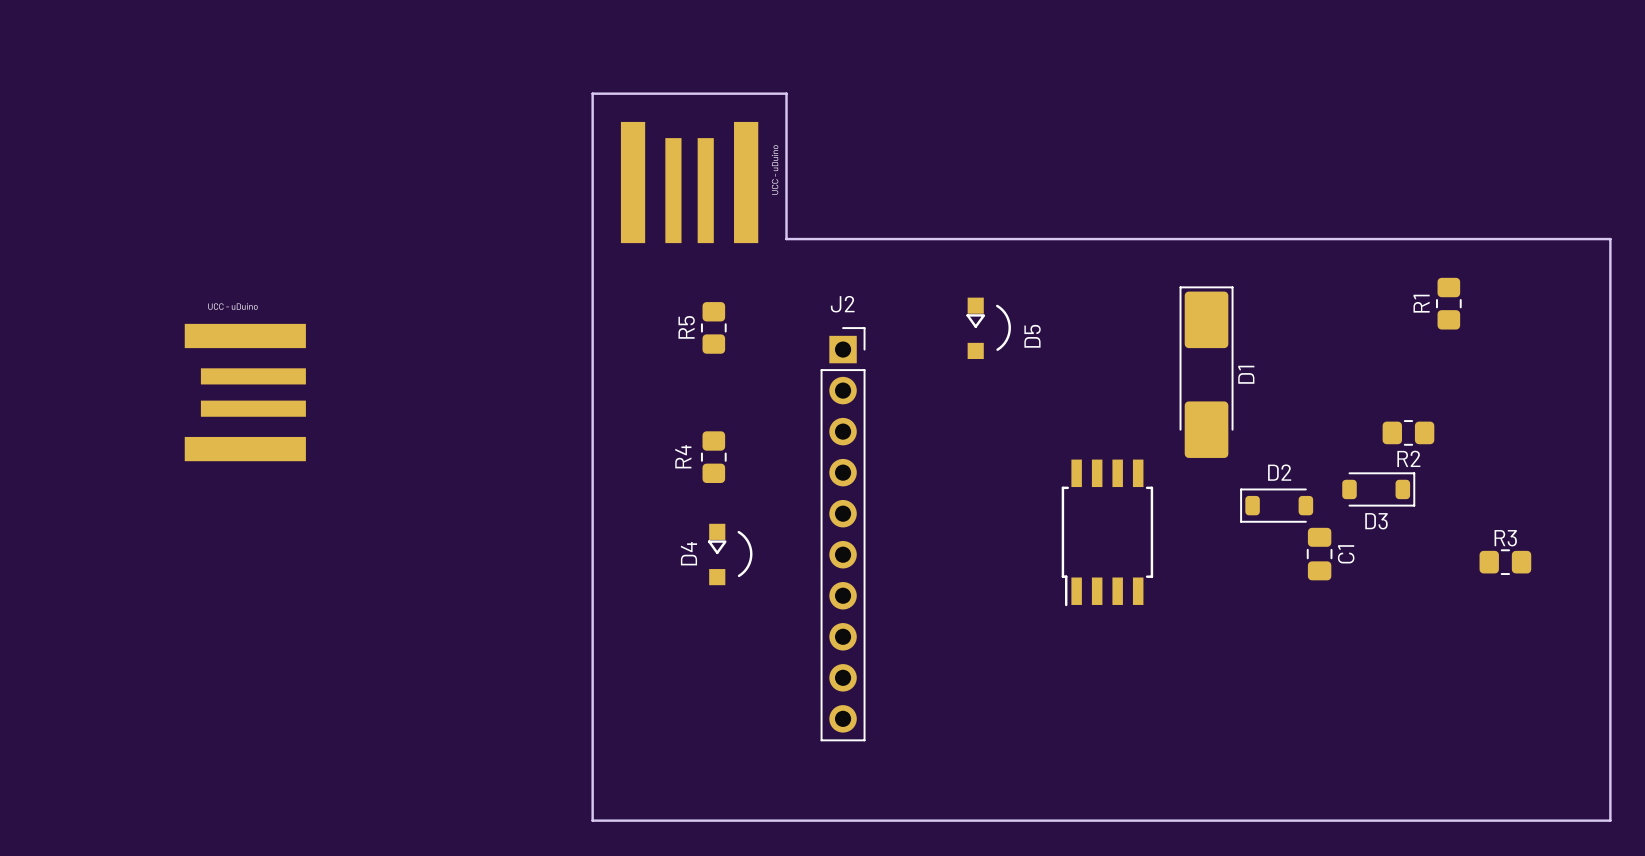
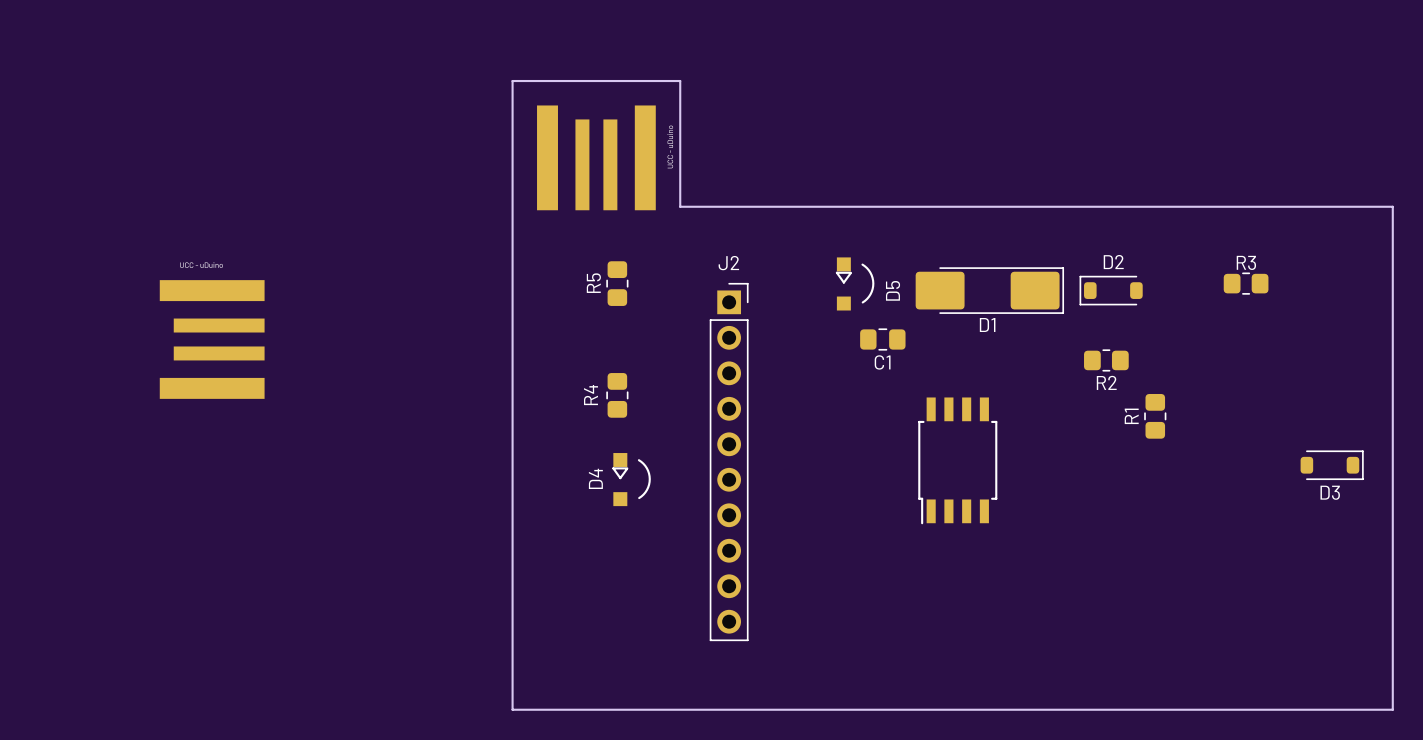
R1 position: (1448, 303) -> (1155, 416)
D1 rotation: 0° (1206, 372) -> 90° clockwise (989, 290)
R2 position: (1408, 432) -> (1106, 360)
D3 position: (1378, 489) -> (1332, 465)
D2 position: (1276, 505) -> (1111, 290)
C1 rotation: 0° (1319, 554) -> 90° clockwise (882, 339)
C1 position: (1319, 554) -> (882, 339)
R3 position: (1505, 562) -> (1246, 283)

